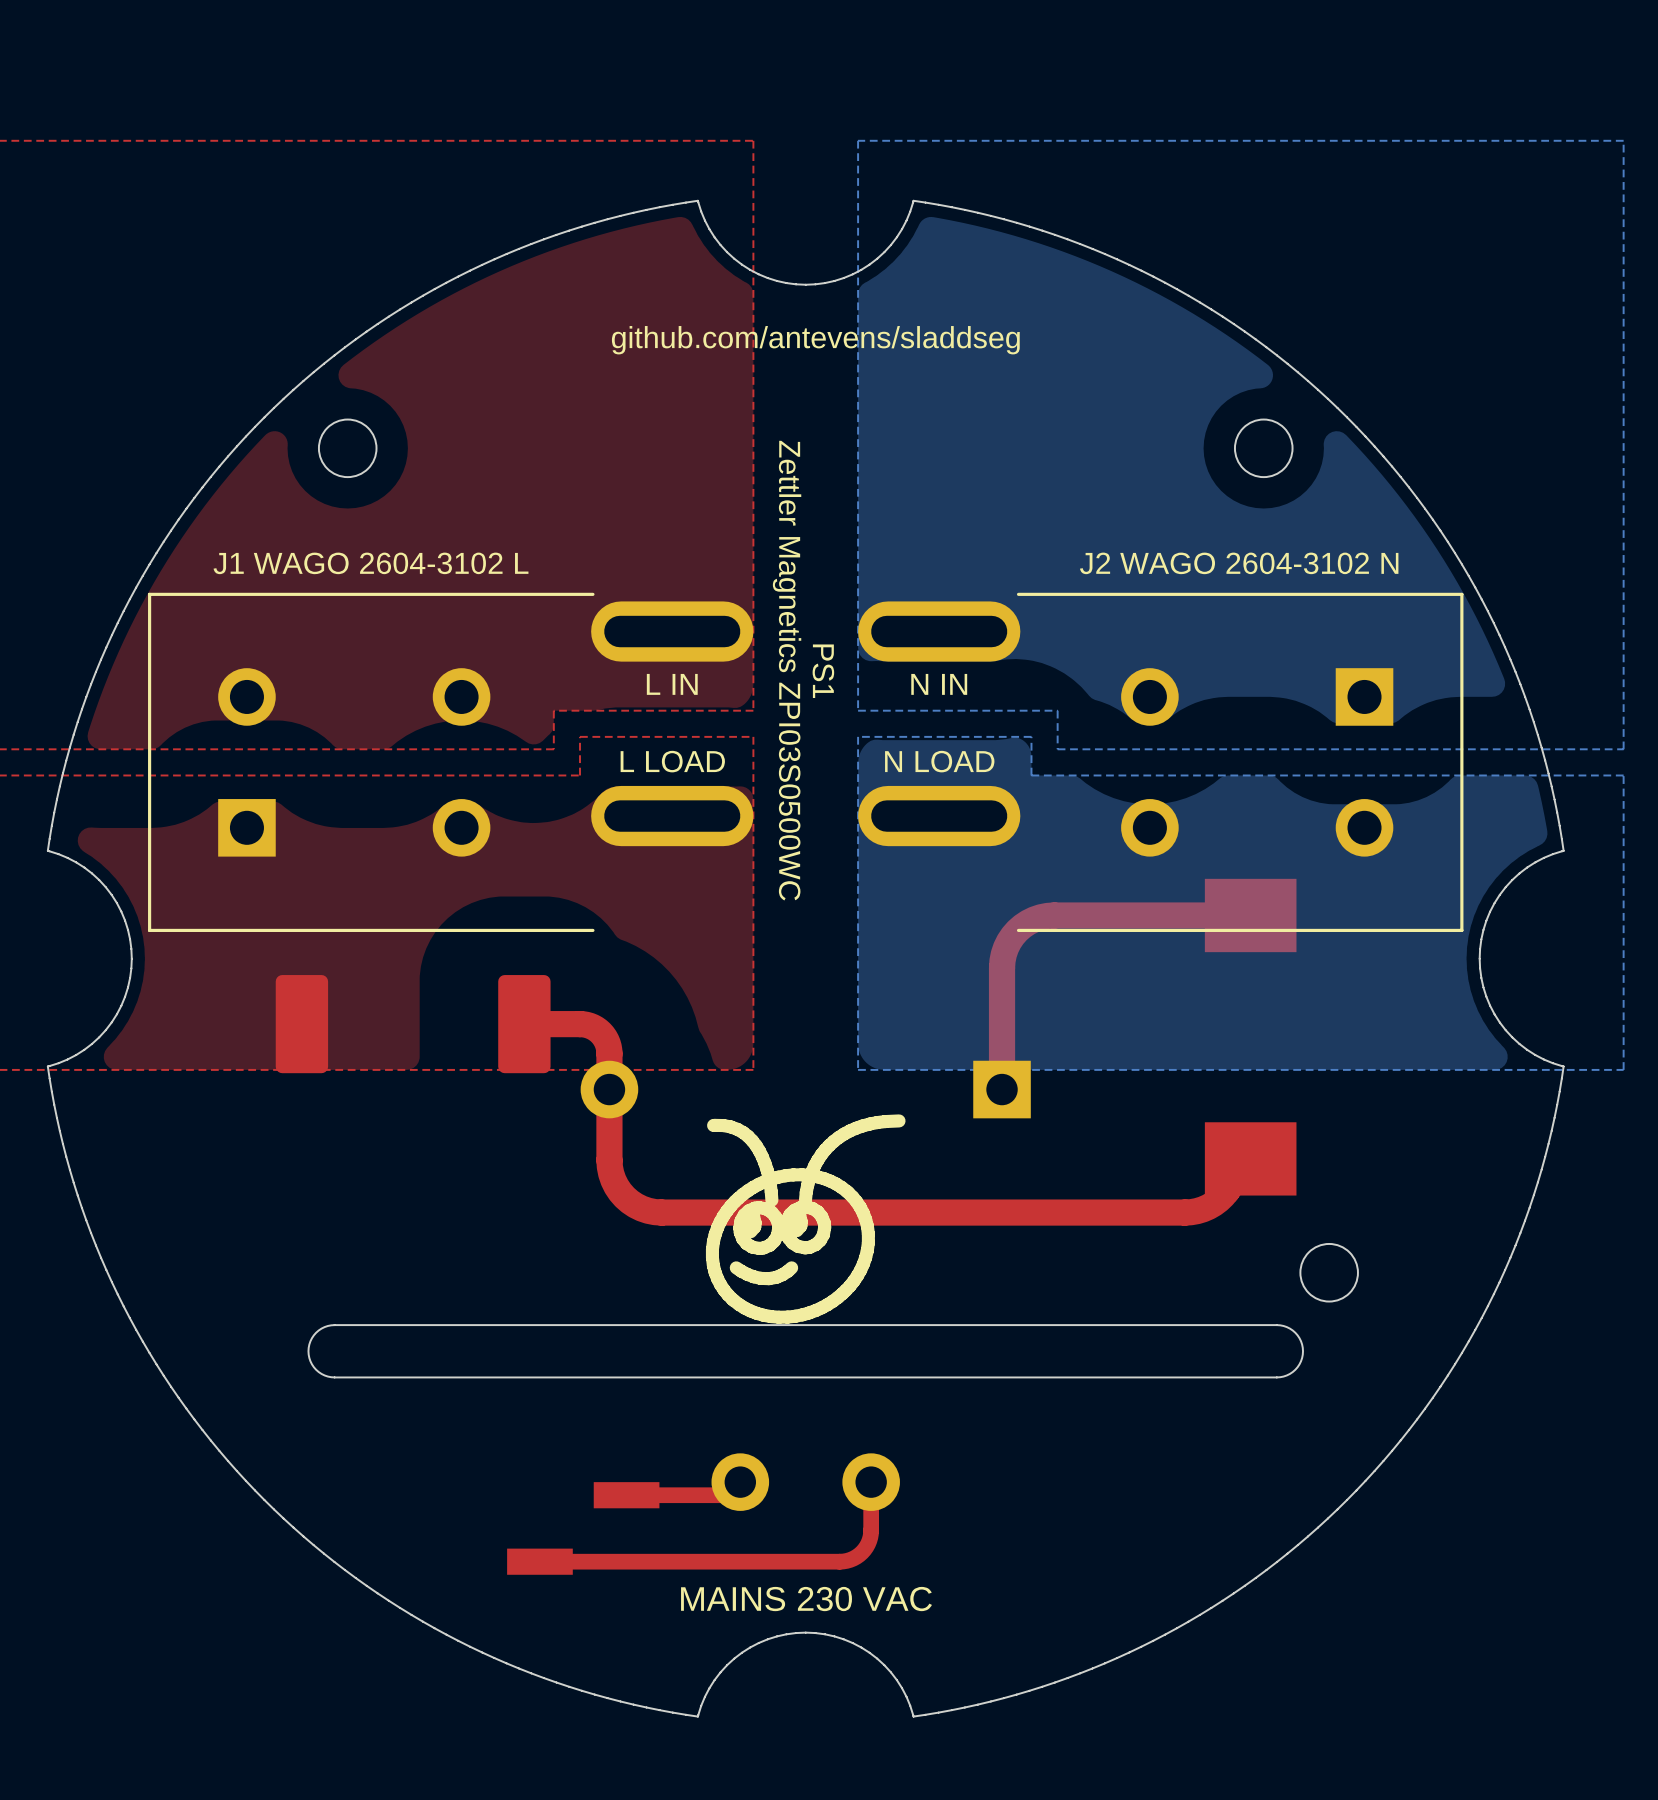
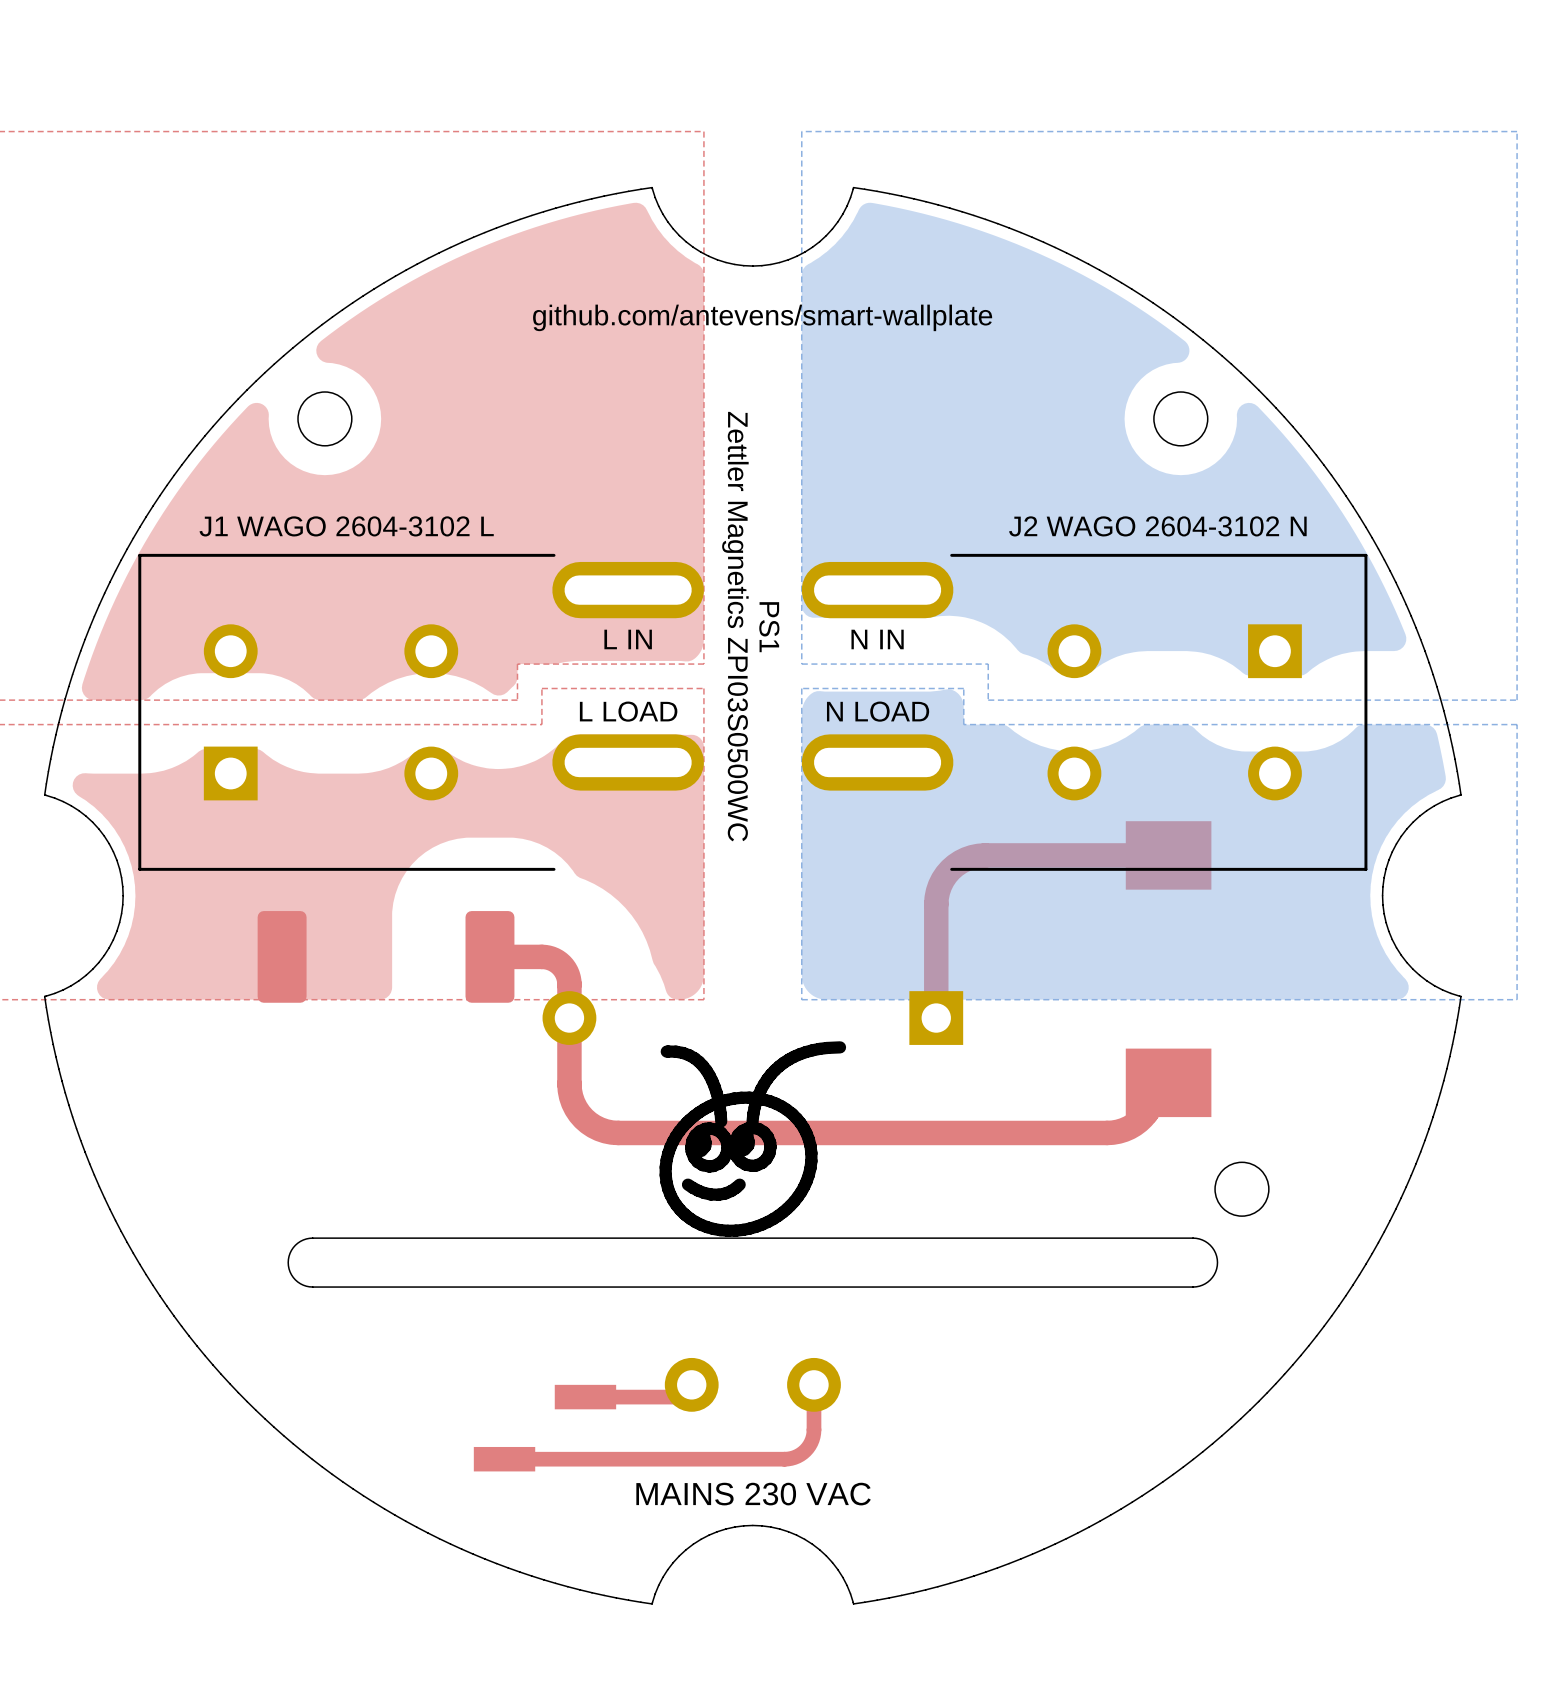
text: github.com/antevens/sladdseg (815, 340) -> github.com/antevens/smart-wallplate (762, 317)

